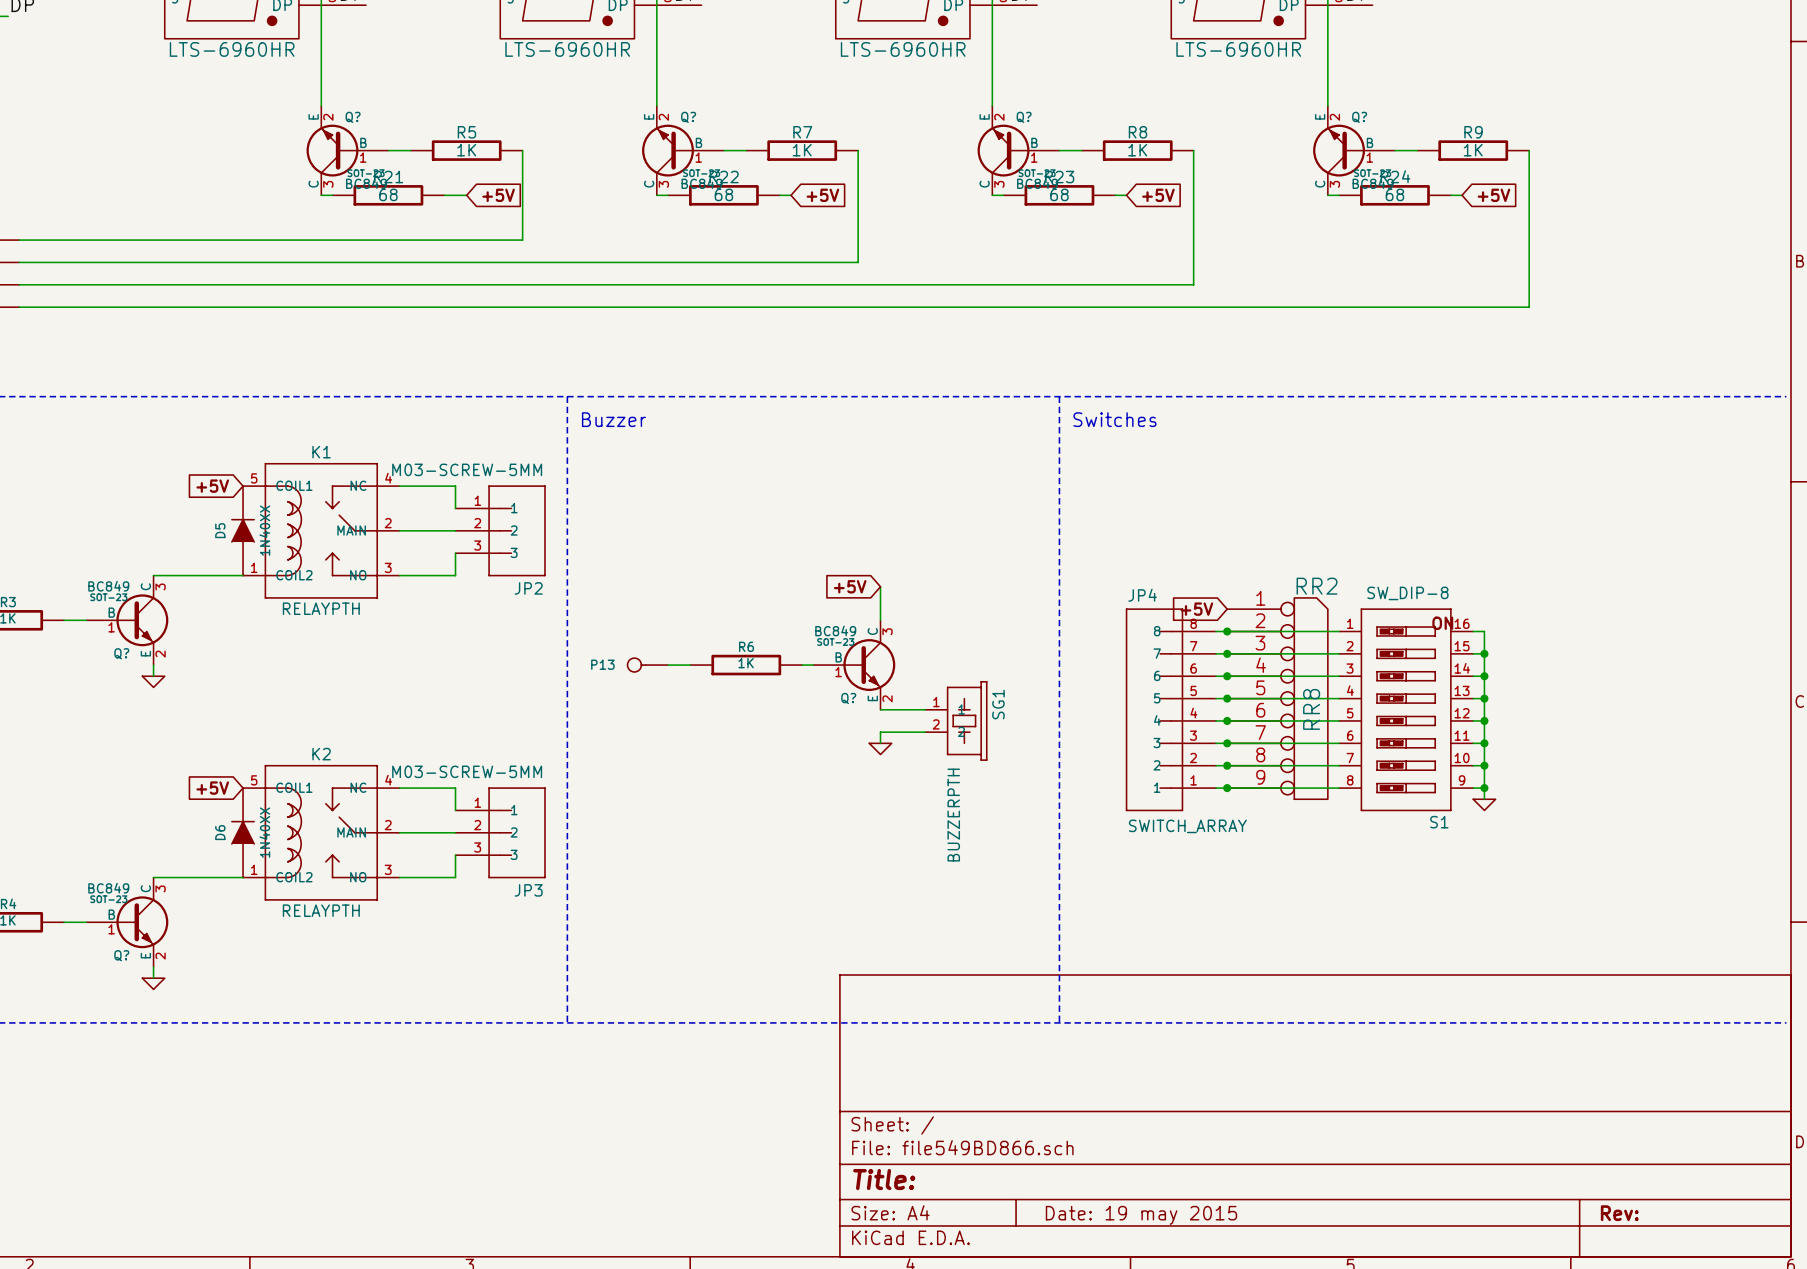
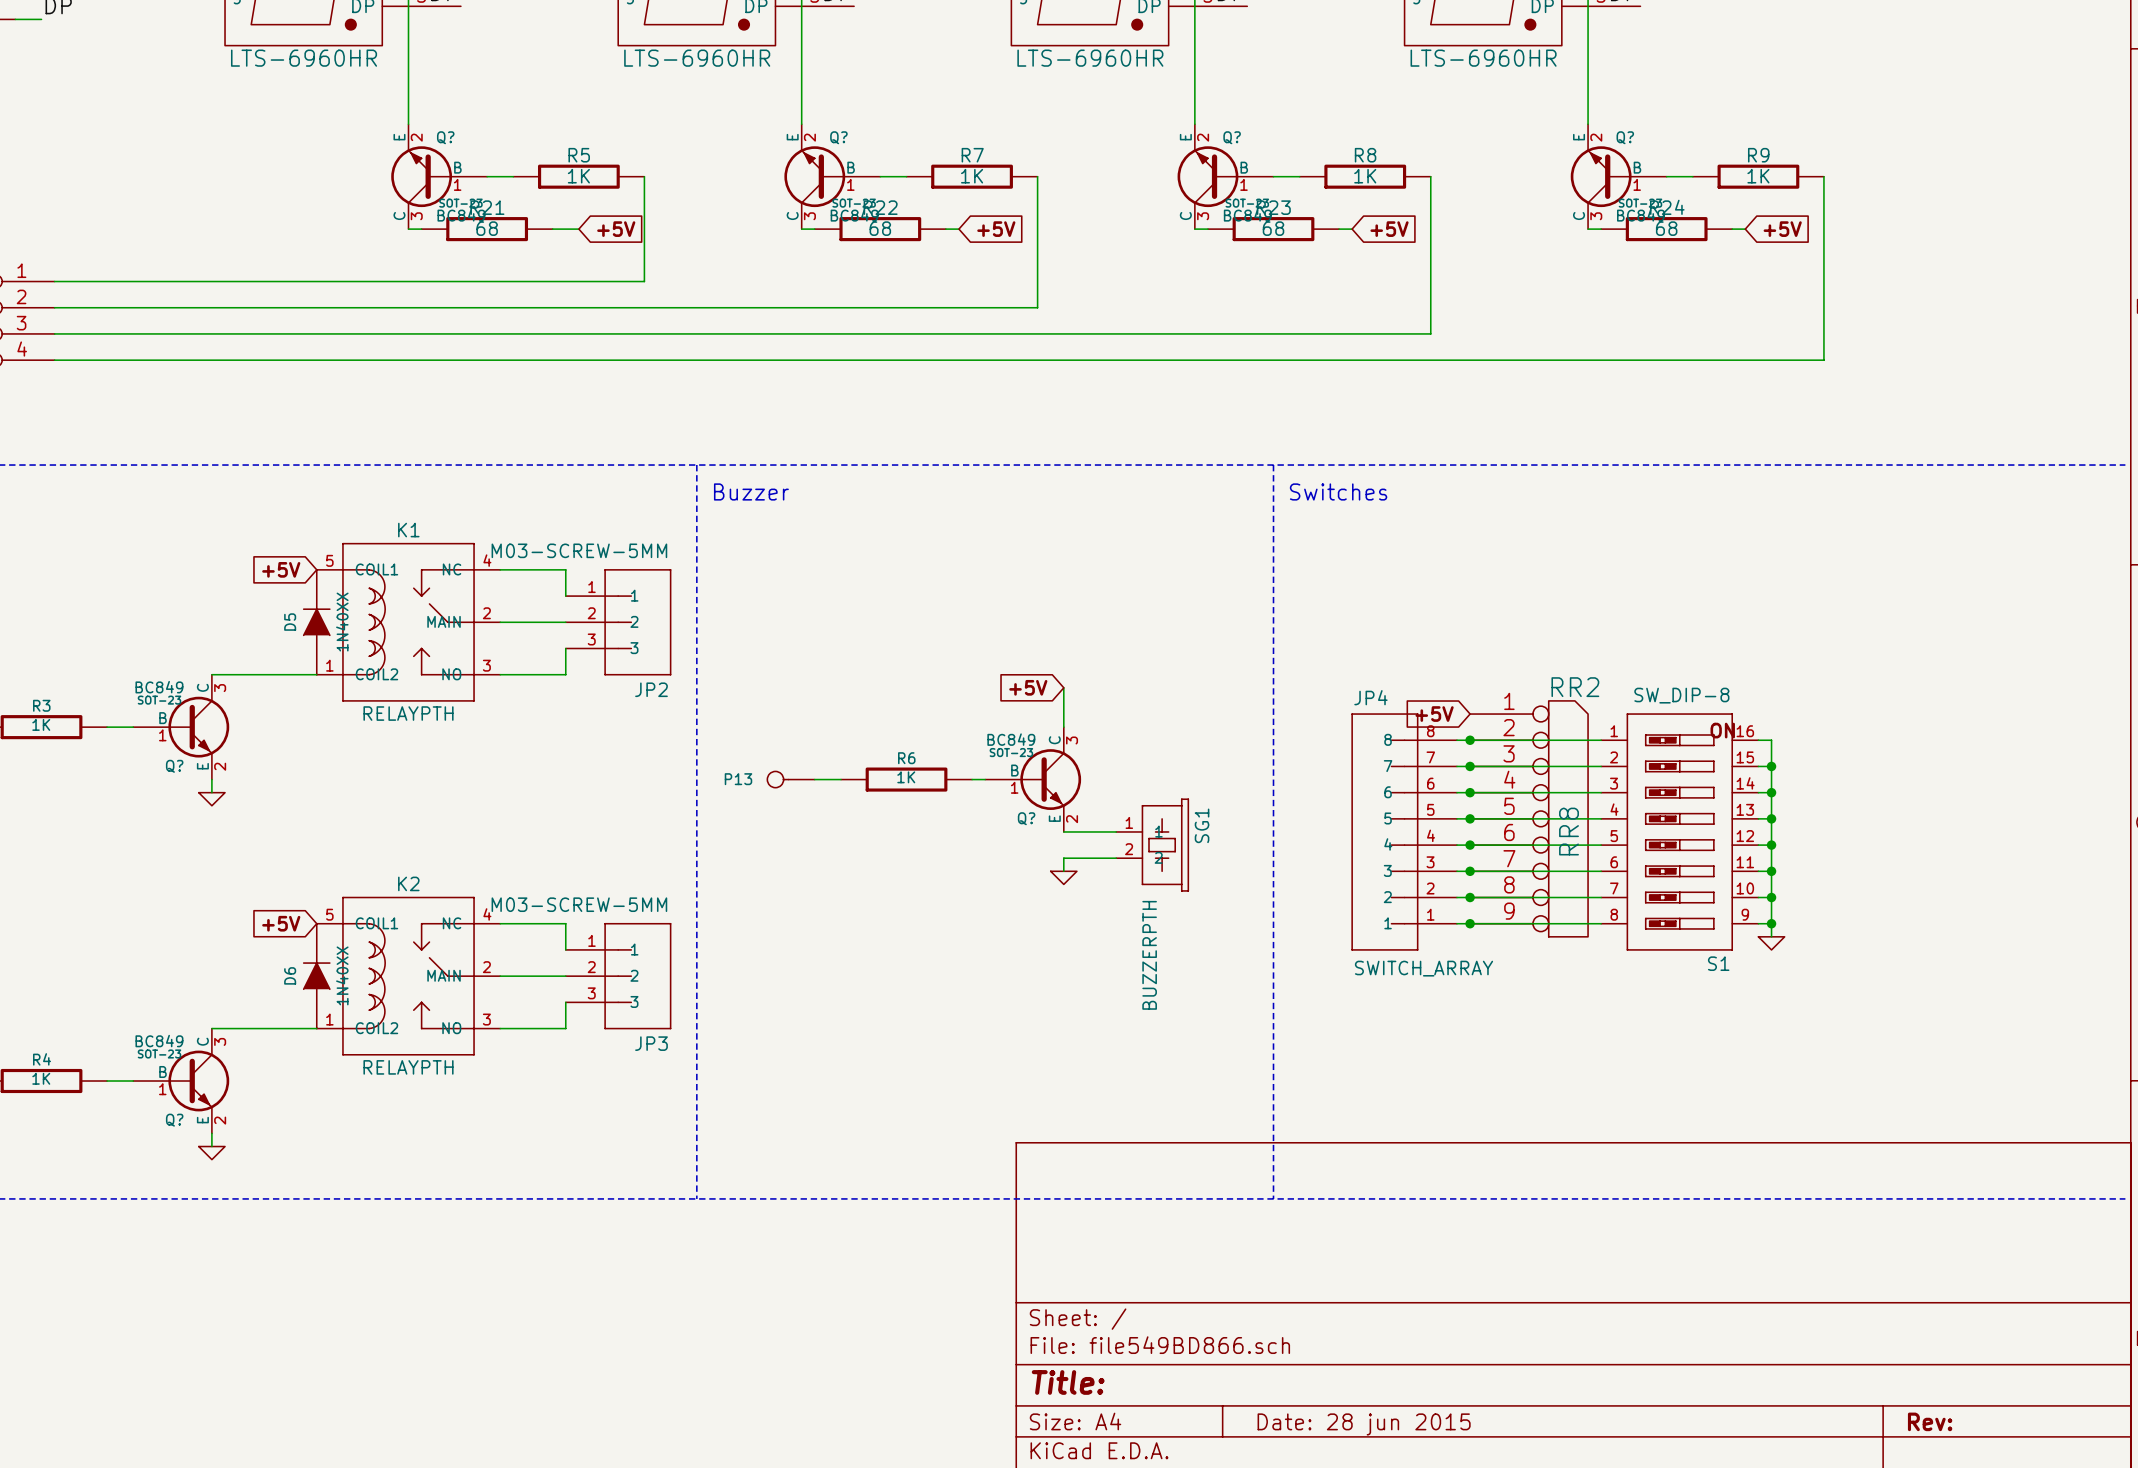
title block: Date: 19 may 2015 (1141, 1215) -> Date: 28 jun 2015 (1364, 1424)

